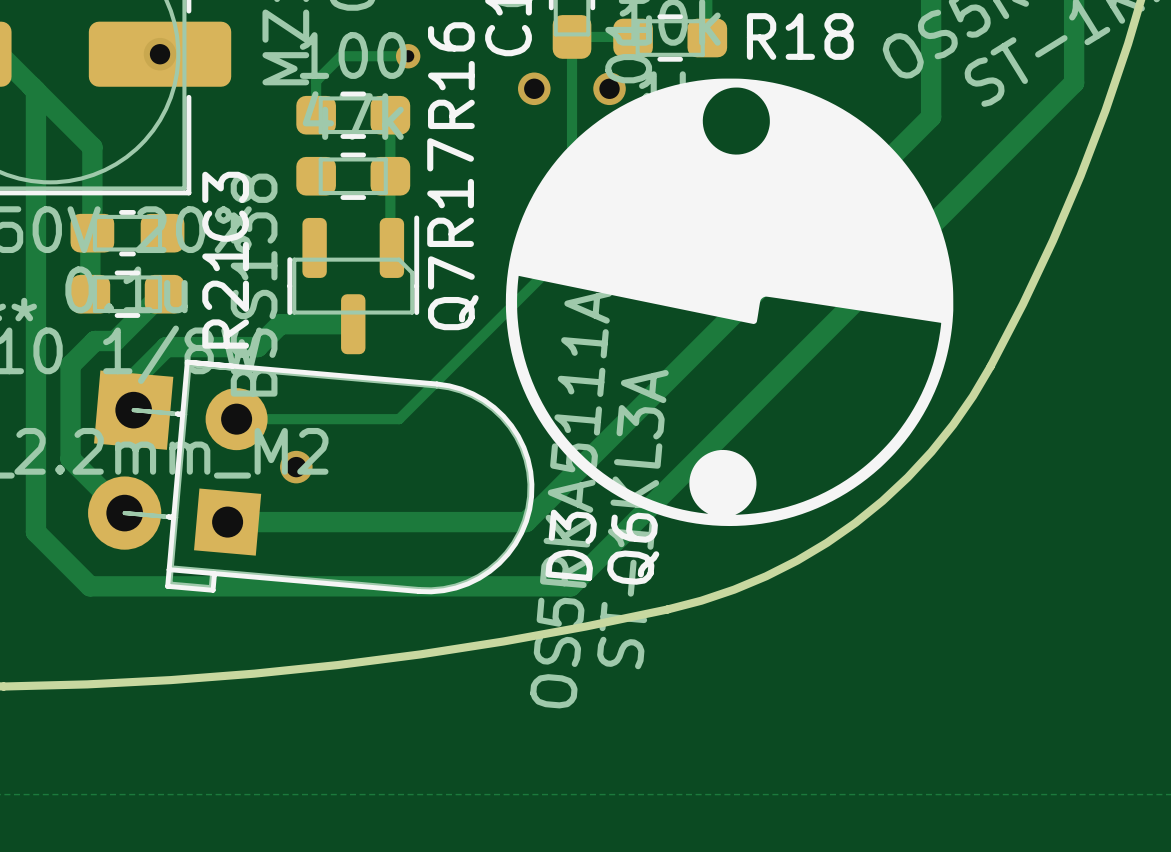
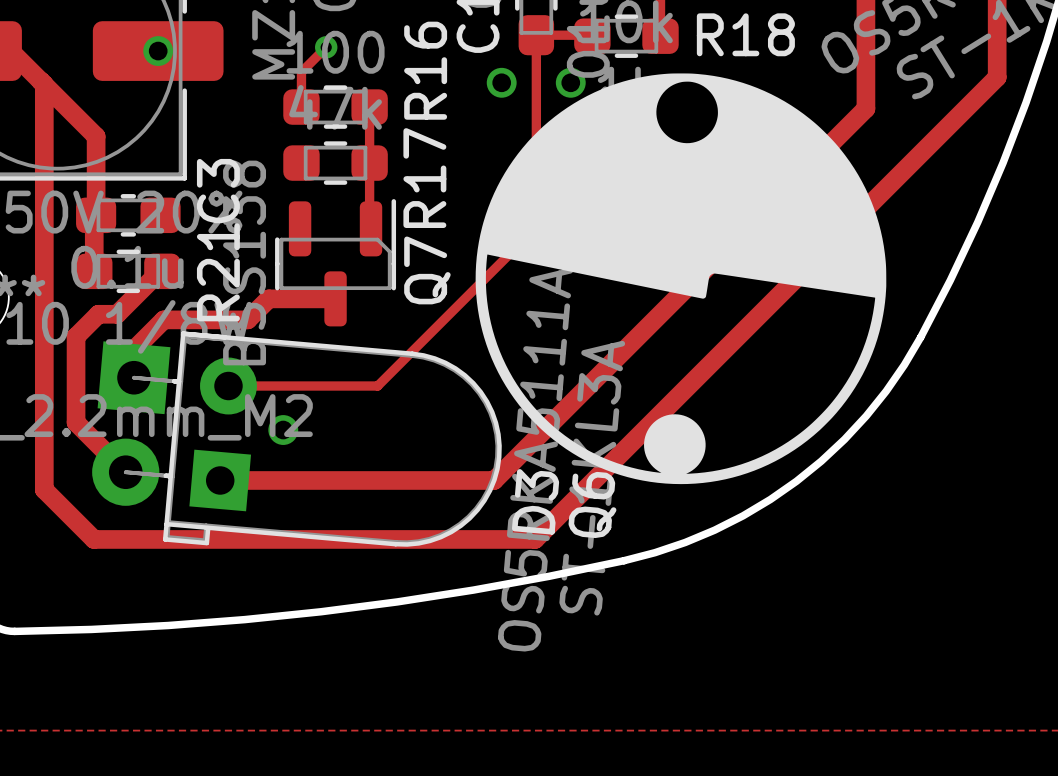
track: (408, 56) (341, 56) (316, 81) -> (326, 47) (301, 72) (301, 75)
via position: (408, 56) -> (326, 47)

